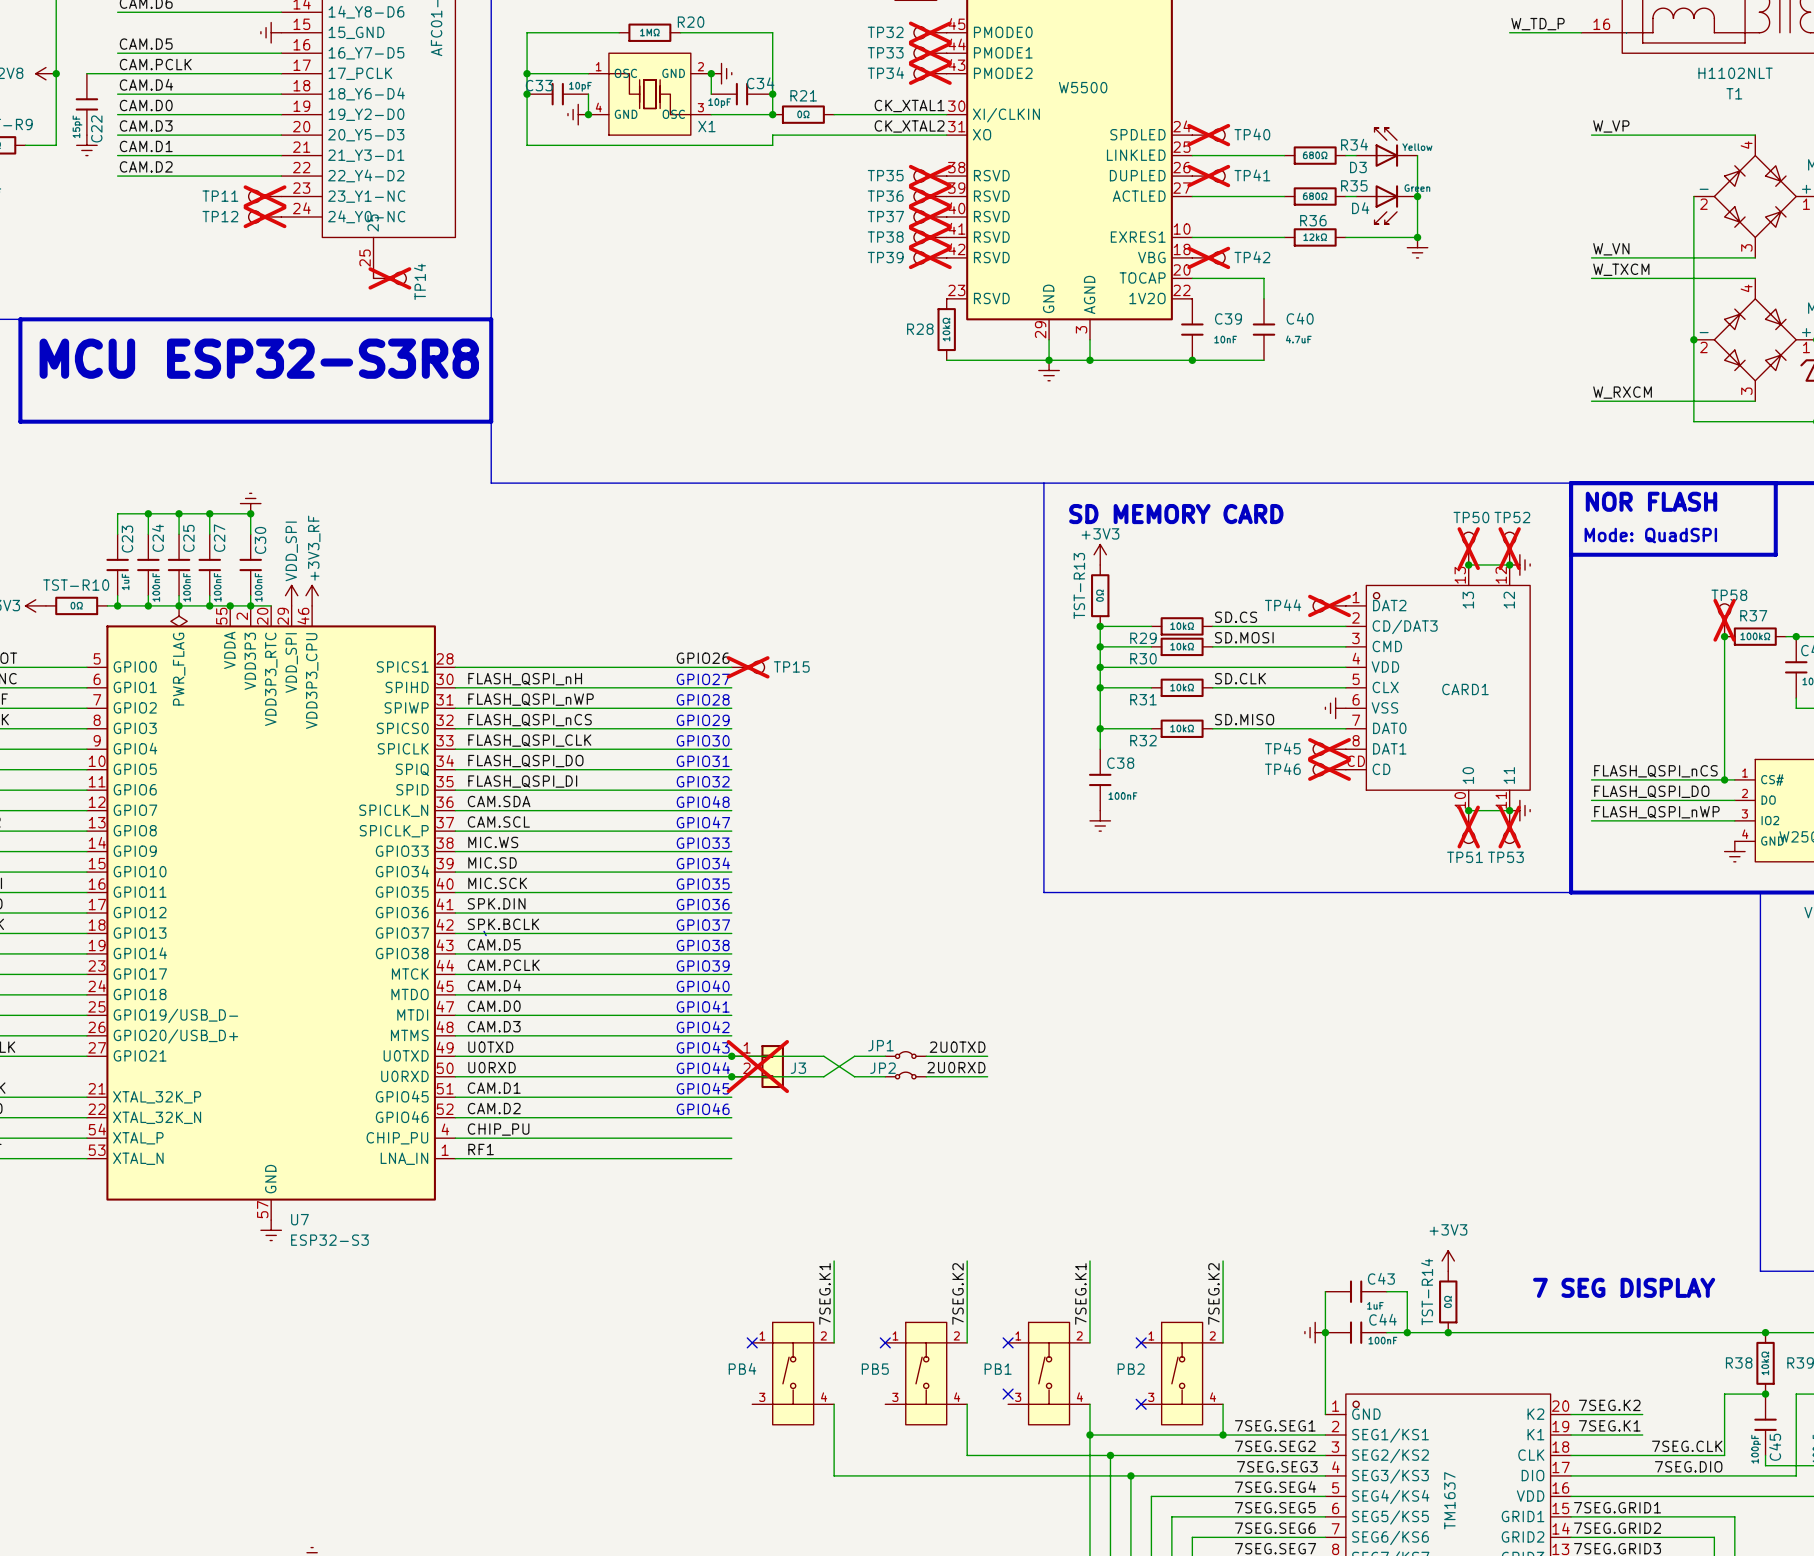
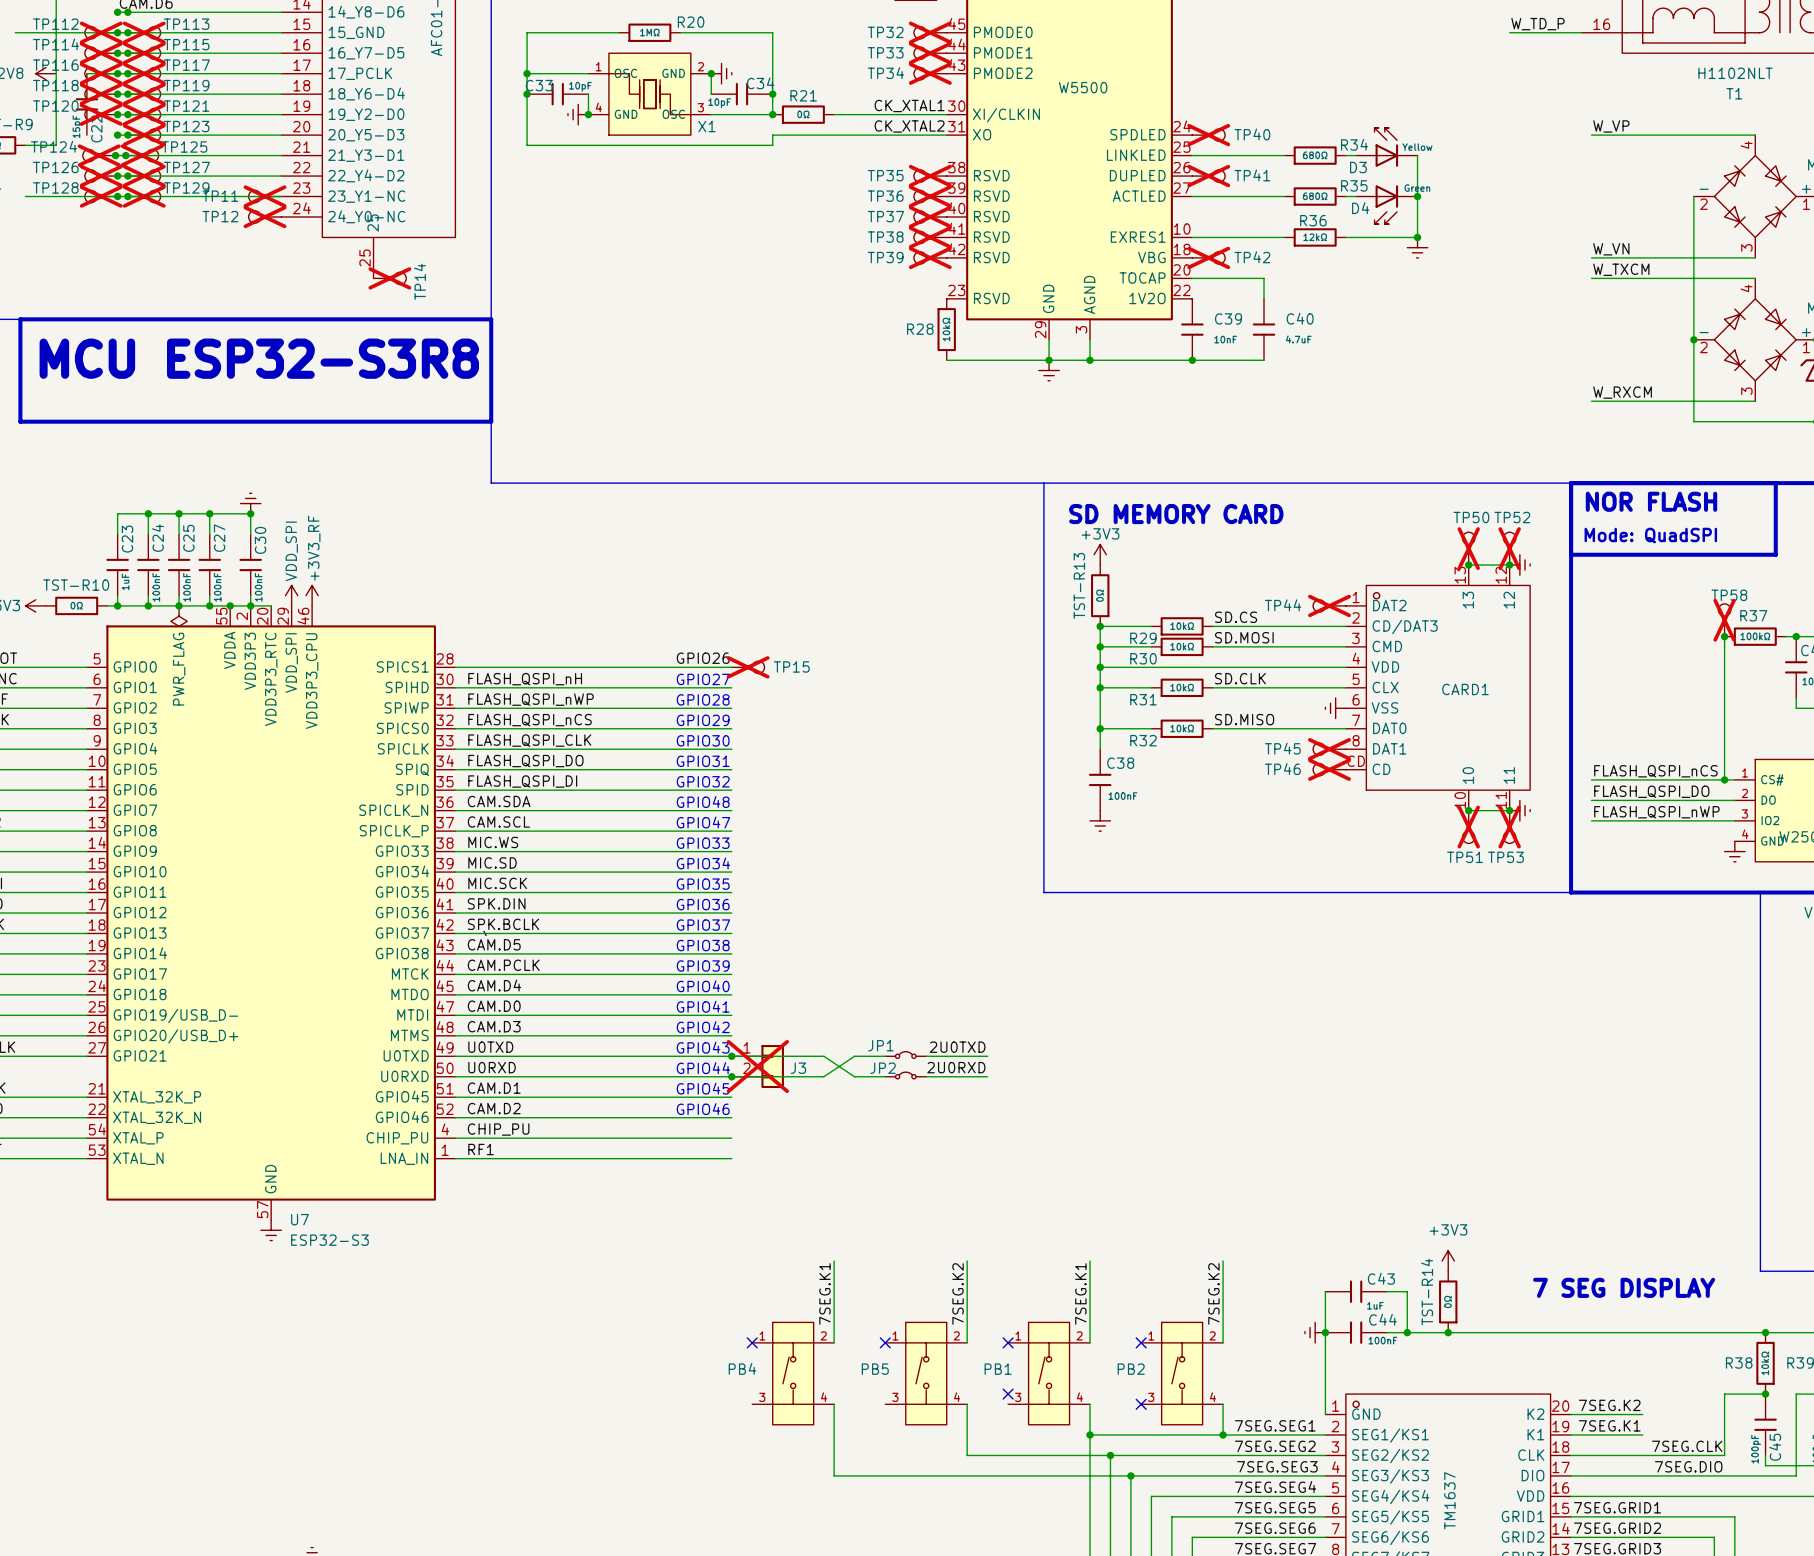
junction: none -> (117, 12)
junction: none -> (127, 12)
wire: none -> (15, 32) (281, 32)
TP112: none -> (101, 32)
junction: none -> (117, 32)
junction: none -> (127, 32)
TP113: none -> (144, 32)
power symbol: (271, 32) -> none
label: CAM.D5 (146, 44) -> none
TP114: none -> (101, 53)
junction: none -> (117, 53)
junction: none -> (127, 53)
TP115: none -> (144, 53)
label: CAM.PCLK (155, 64) -> none
junction: (56, 73) -> none
TP116: none -> (101, 73)
junction: none -> (117, 73)
junction: none -> (127, 73)
TP117: none -> (144, 73)
label: CAM.D4 (146, 84) -> none
TP118: none -> (101, 94)
junction: none -> (117, 94)
junction: none -> (127, 94)
TP119: none -> (144, 94)
label: CAM.D0 (146, 105) -> none
TP120: none -> (101, 114)
junction: none -> (117, 114)
junction: none -> (127, 114)
TP121: none -> (144, 114)
label: CAM.D3 (146, 125) -> none
junction: none -> (117, 135)
junction: none -> (127, 135)
TP123: none -> (144, 135)
power symbol: (86, 145) -> none
label: CAM.D1 (146, 146) -> none
TP124: none -> (99, 155)
junction: none -> (115, 155)
junction: none -> (125, 155)
TP125: none -> (142, 155)
label: CAM.D2 (146, 166) -> none
TP126: none -> (101, 176)
junction: none -> (117, 176)
junction: none -> (127, 176)
TP127: none -> (144, 176)
wire: none -> (25, 196) (281, 196)
TP128: none -> (101, 196)
junction: none -> (117, 196)
junction: none -> (127, 196)
TP129: none -> (144, 196)

